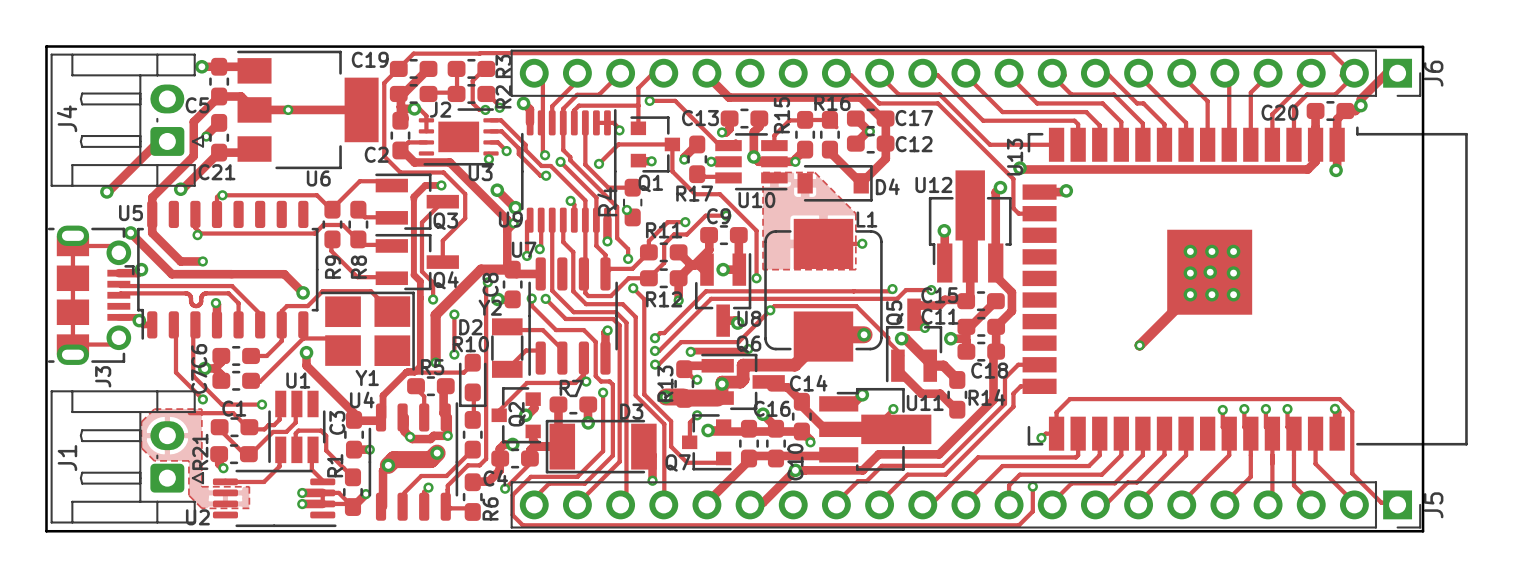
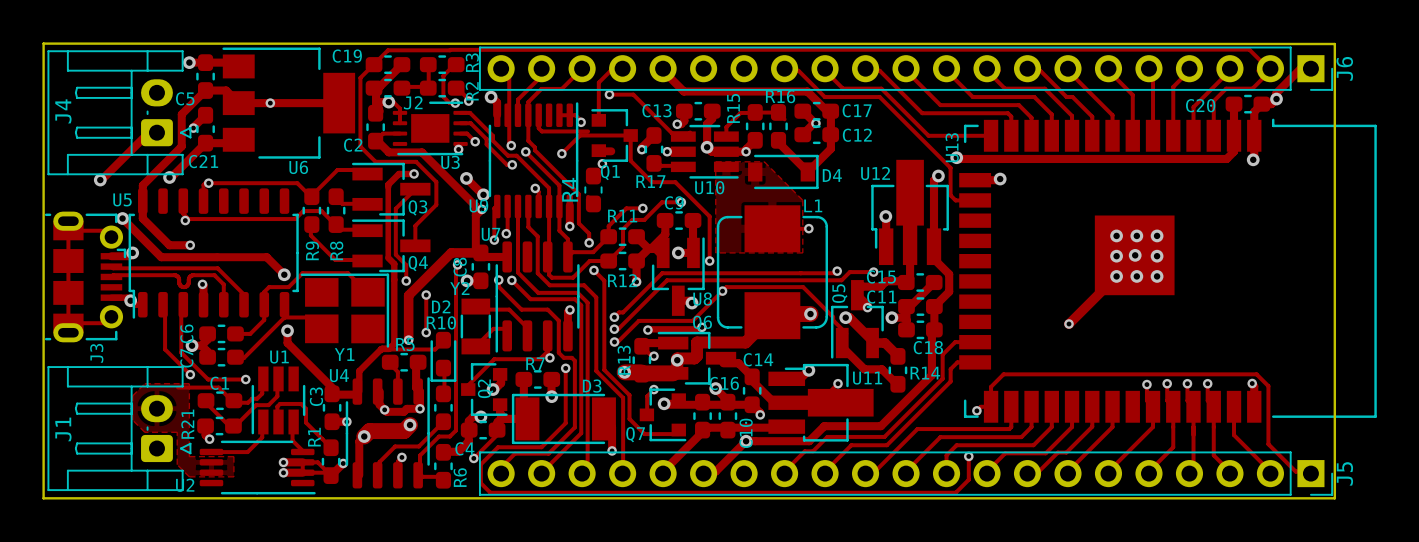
track: (638, 105) (578, 105) (574, 110) (574, 122) -> (588, 131) (541, 131) (538, 128) (538, 115)
track: (585, 122) (585, 164) (608, 187) (632, 187) -> none
via position: (651, 161) -> (602, 163)
via: (626, 210) -> none

